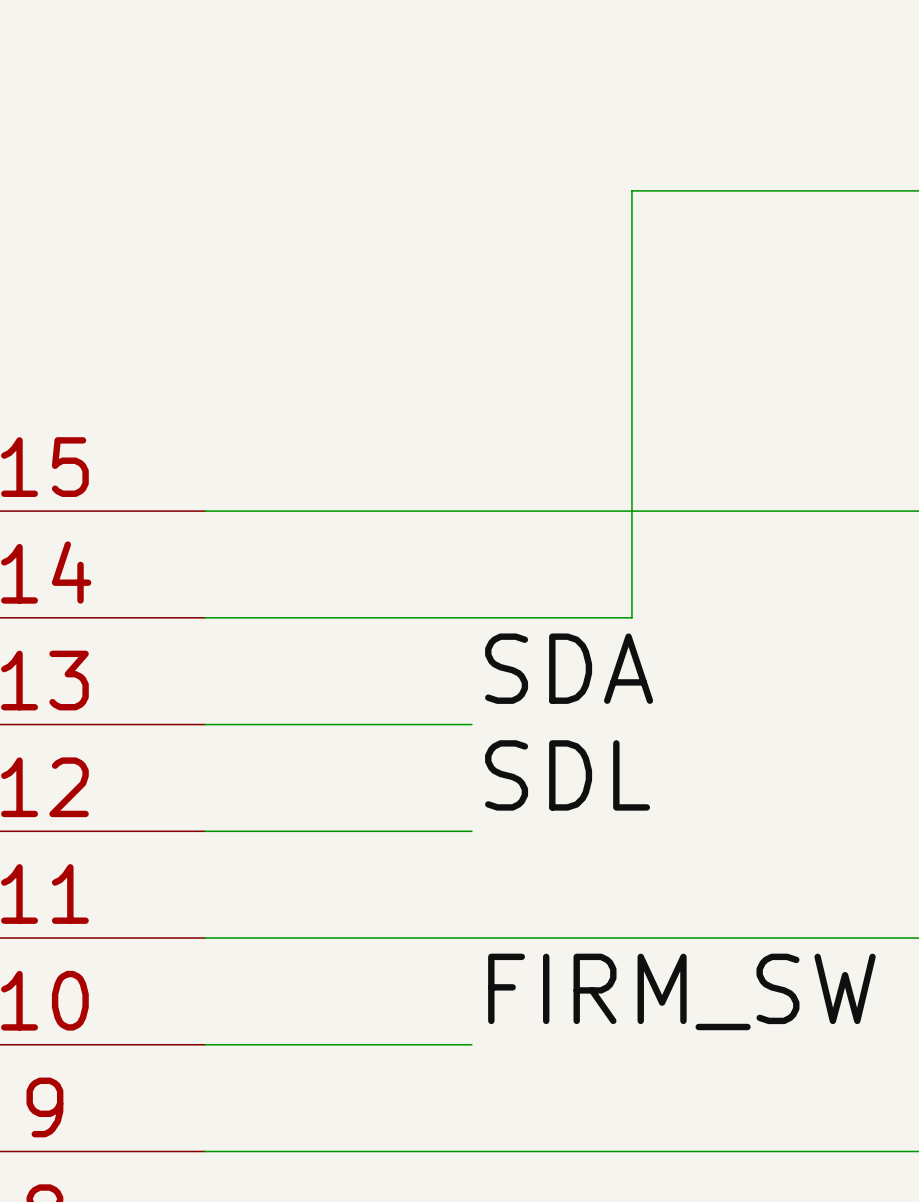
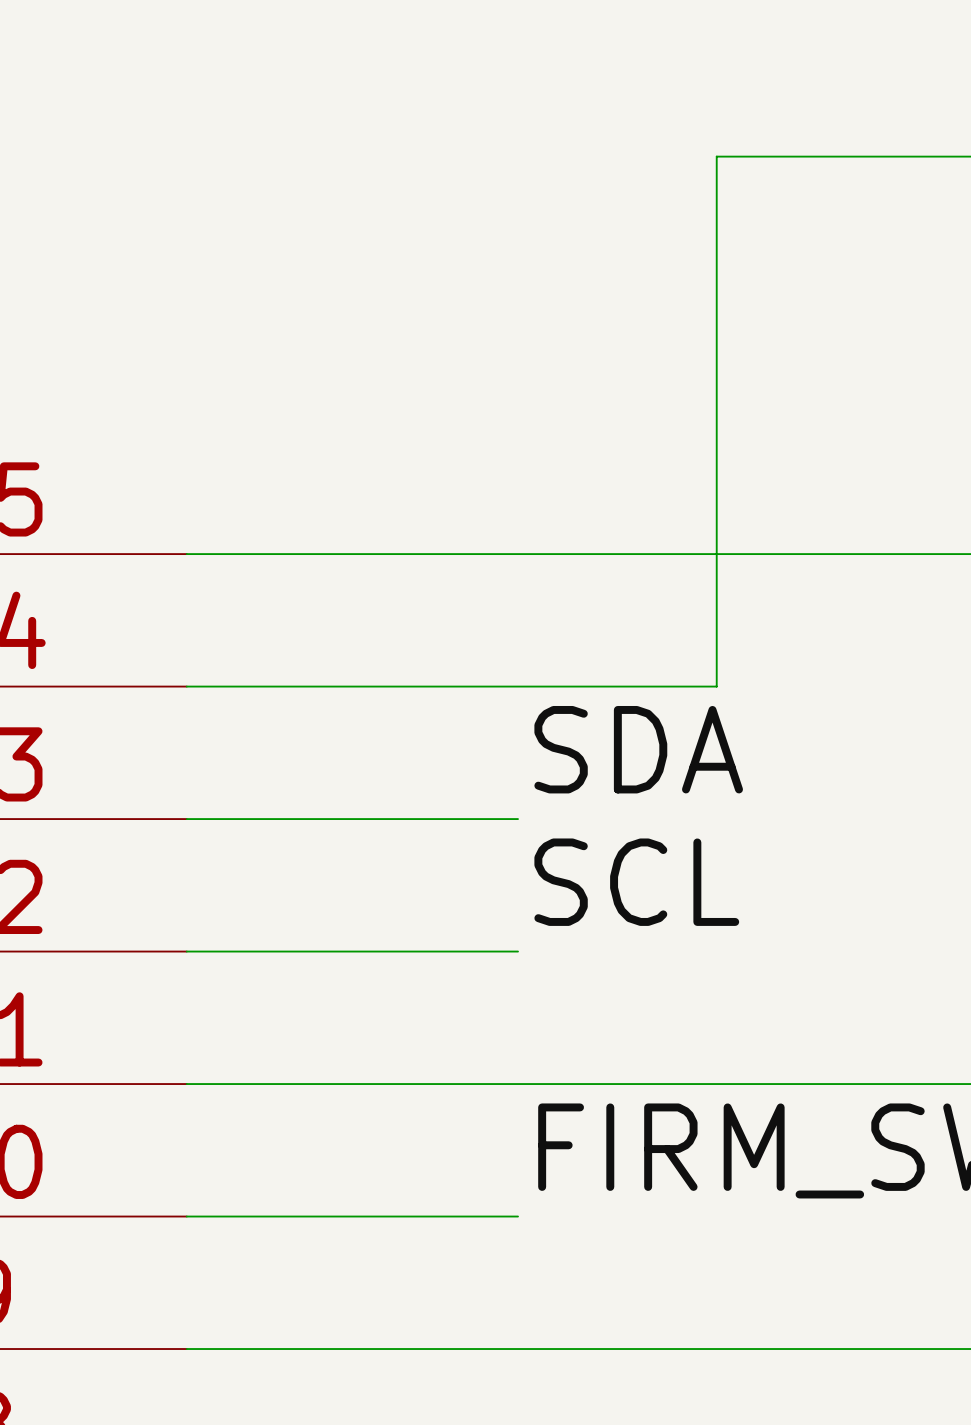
label: SDL (567, 775) -> SCL (636, 882)

